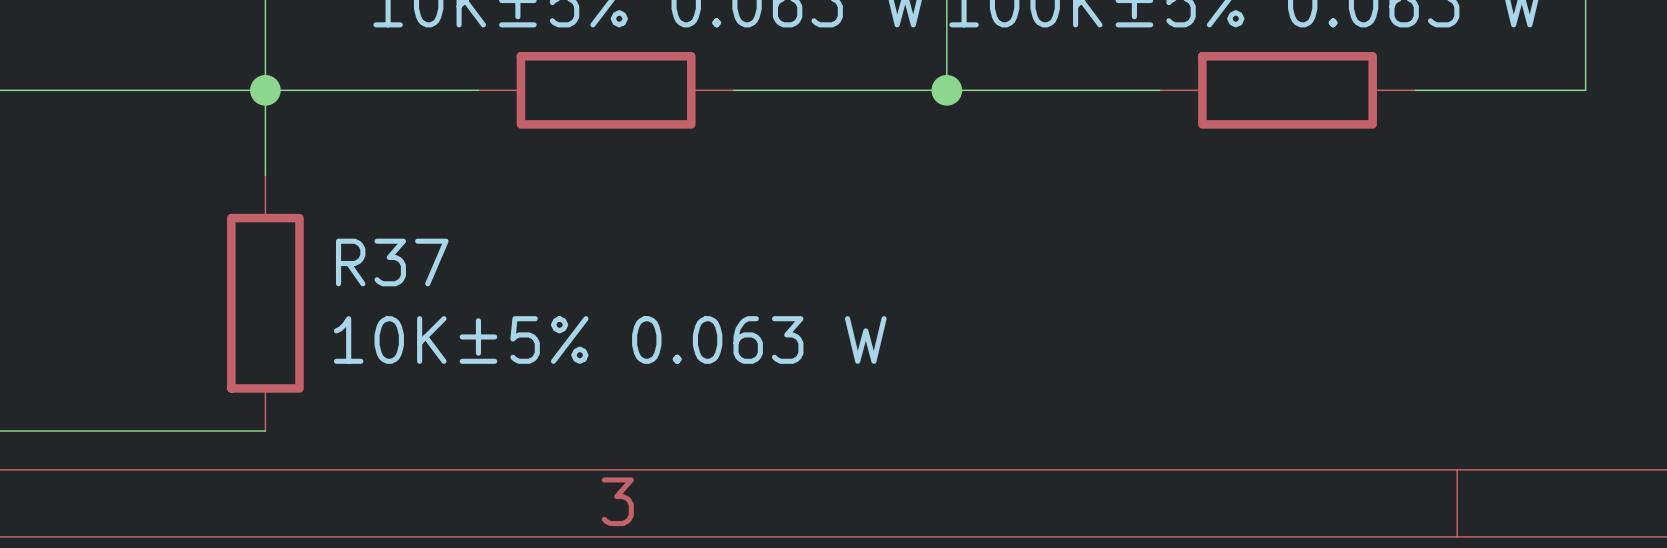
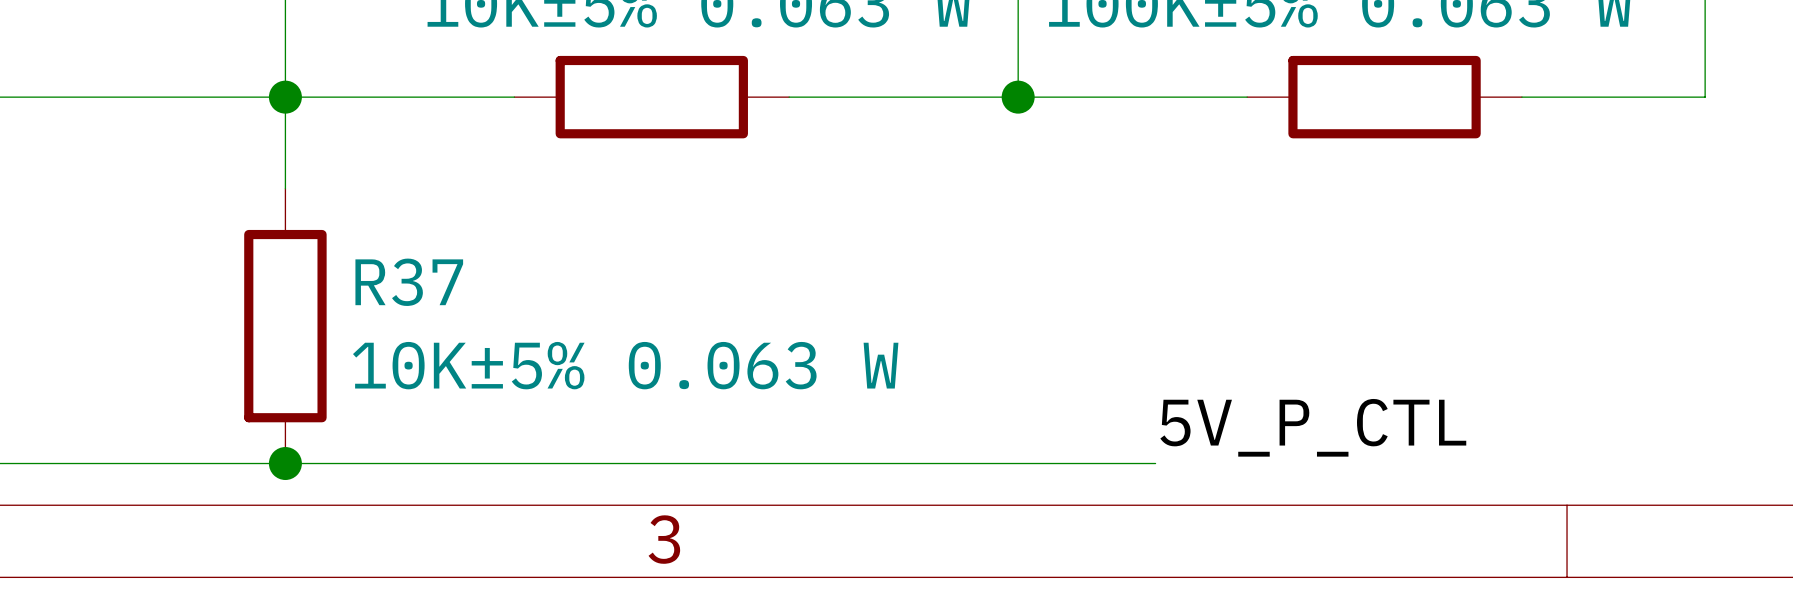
label: none -> 5V_P_CTL (1313, 427)
wire: none -> (285, 463) (1155, 463)
junction: none -> (285, 463)

